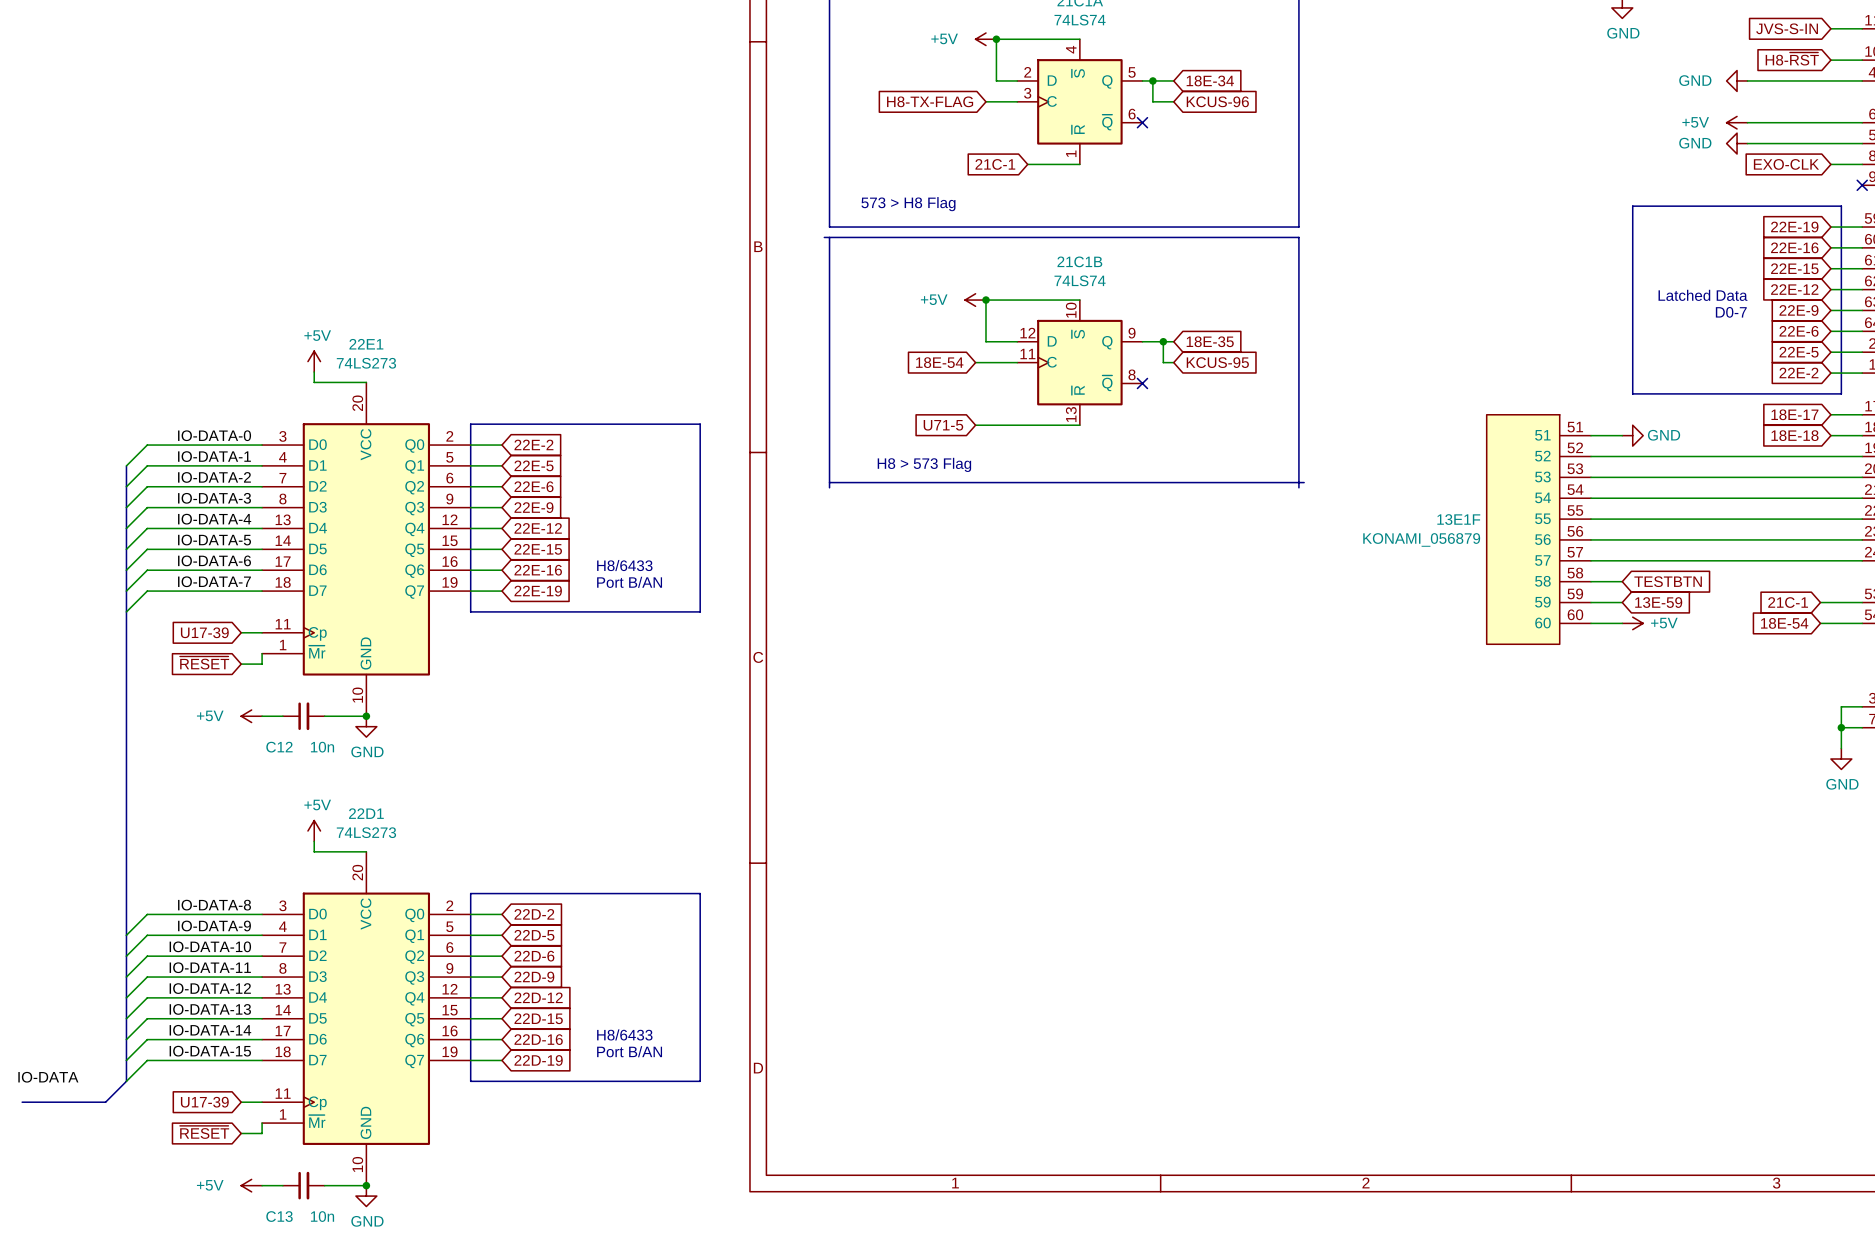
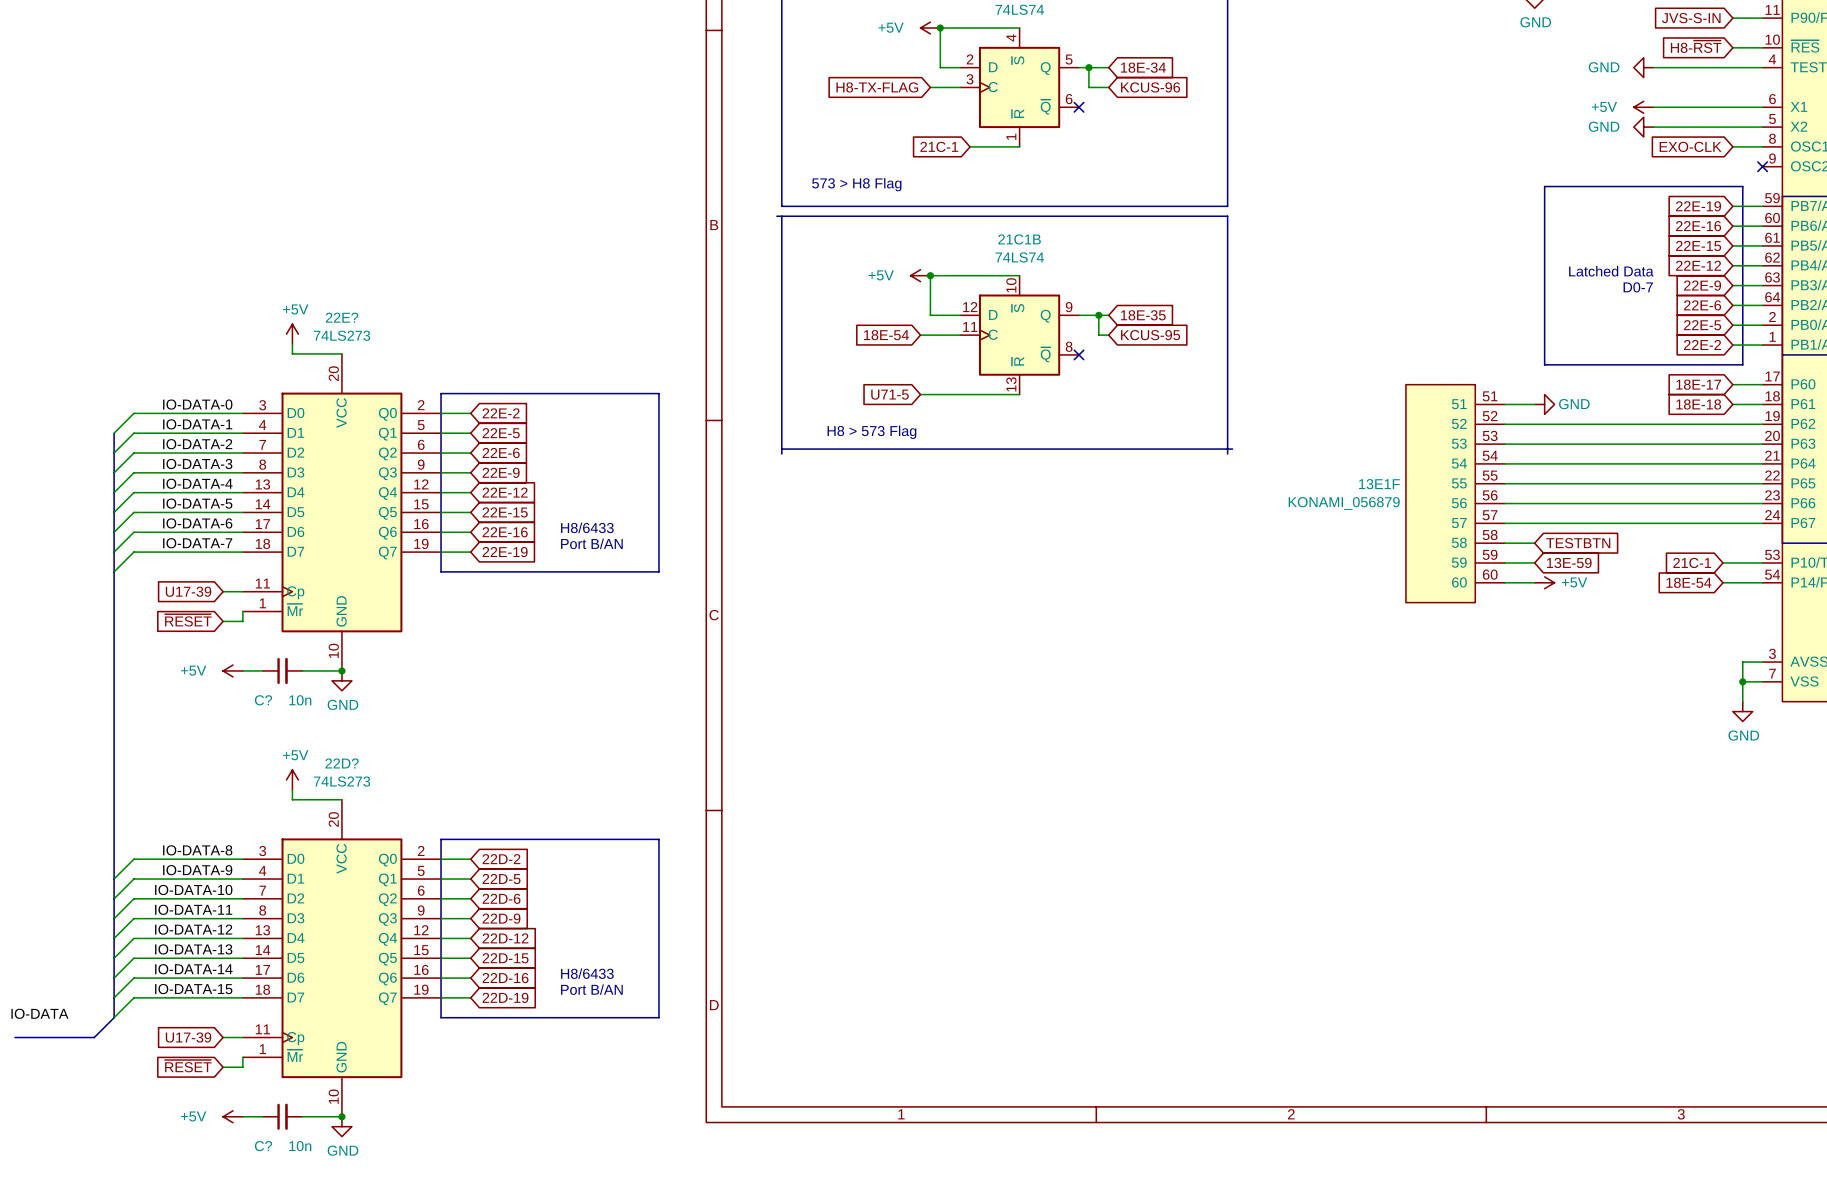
22E1 name: 22E1 (366, 344) -> 22E? (342, 317)
C12 name: C12 (279, 747) -> C? (263, 700)
22D1 name: 22D1 (366, 813) -> 22D? (342, 763)
C13 name: C13 (279, 1216) -> C? (263, 1146)

